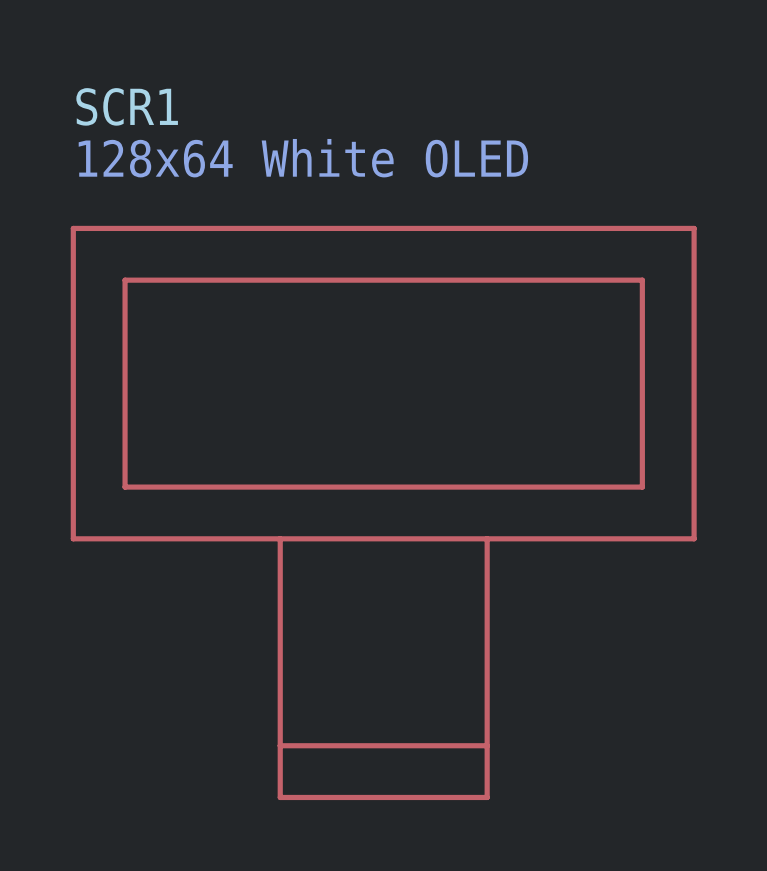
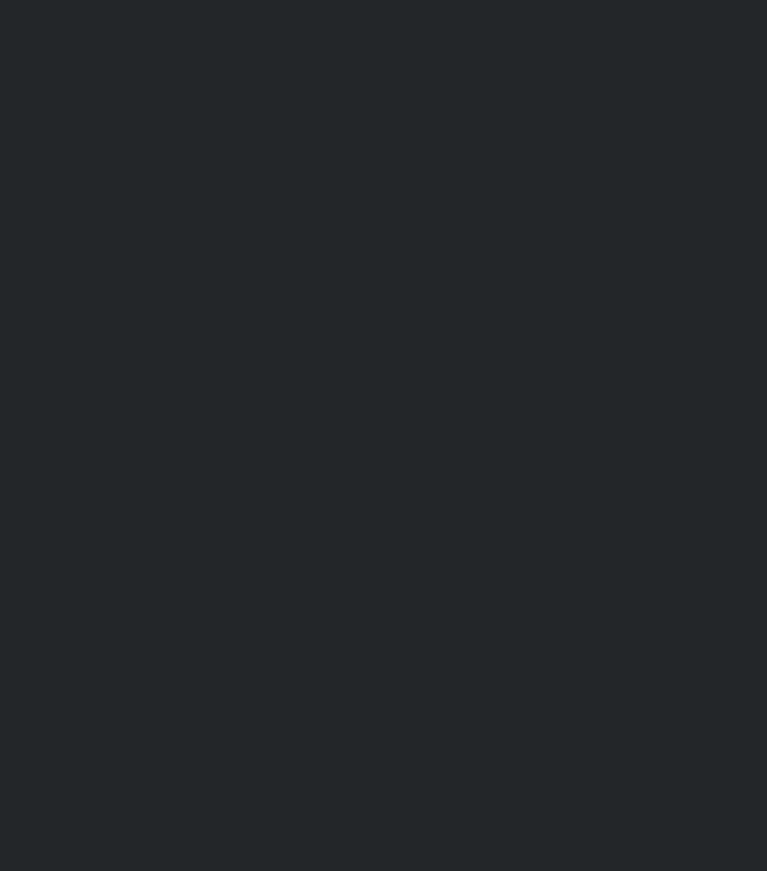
SCR1: 128x64 White OLED (383, 512) -> none

